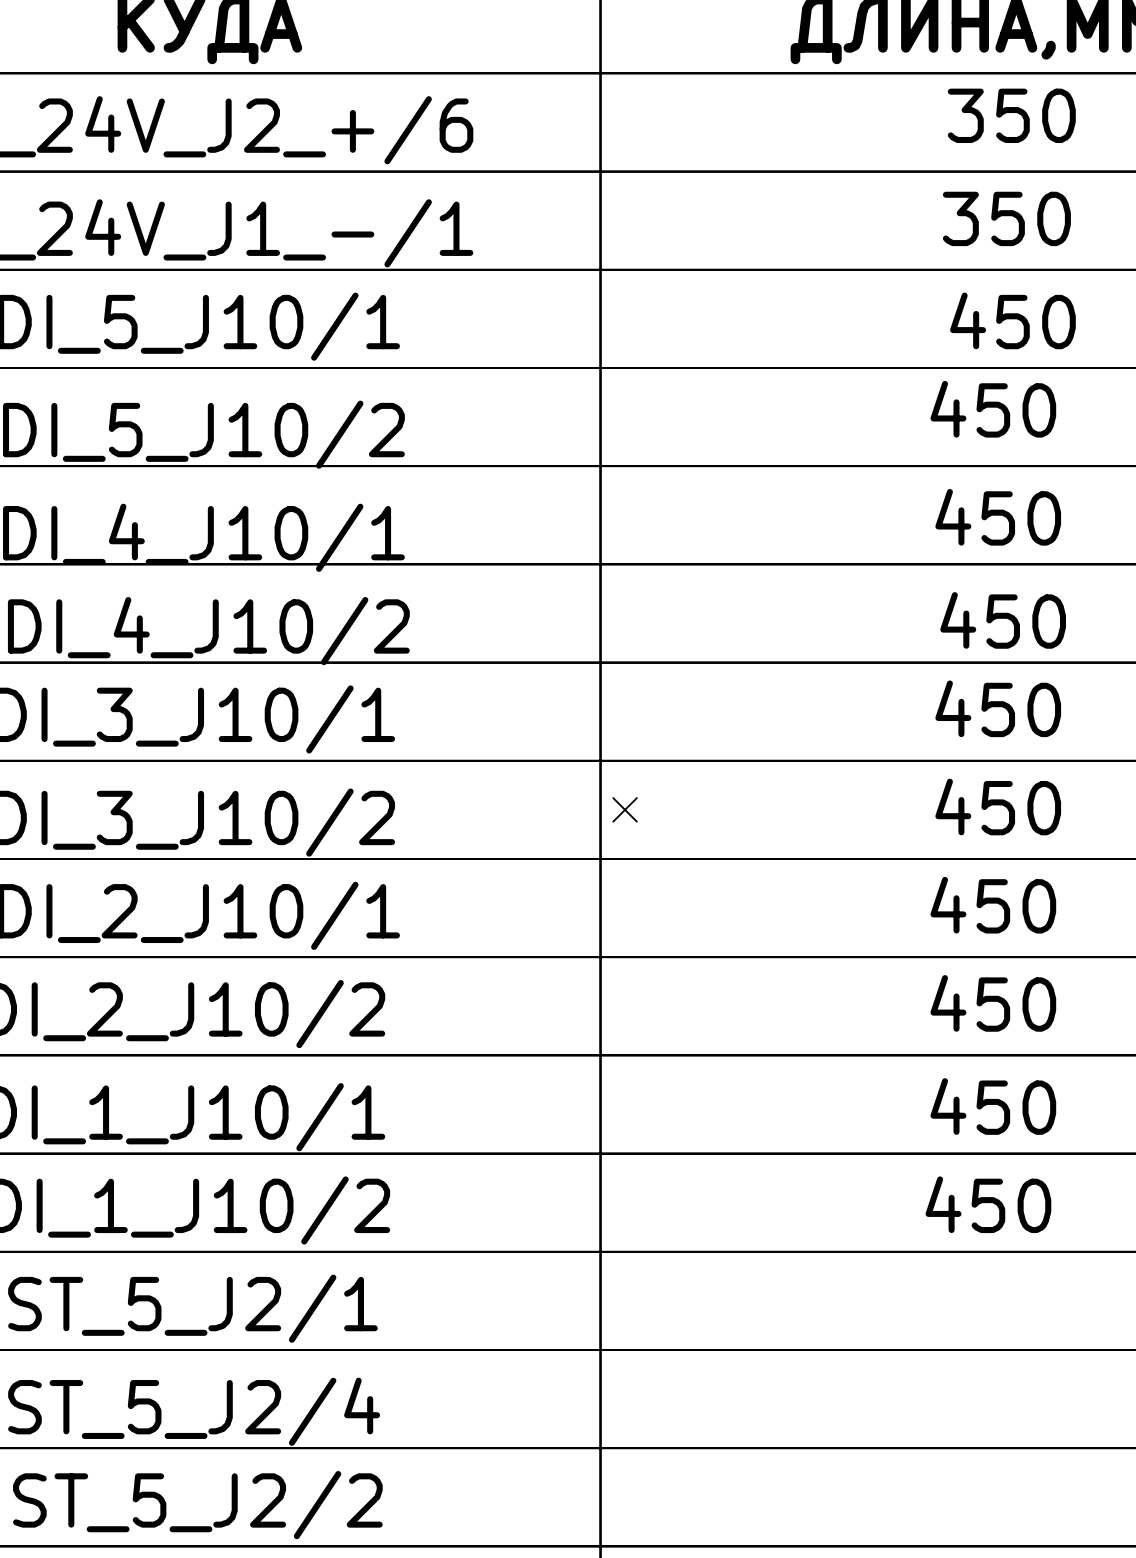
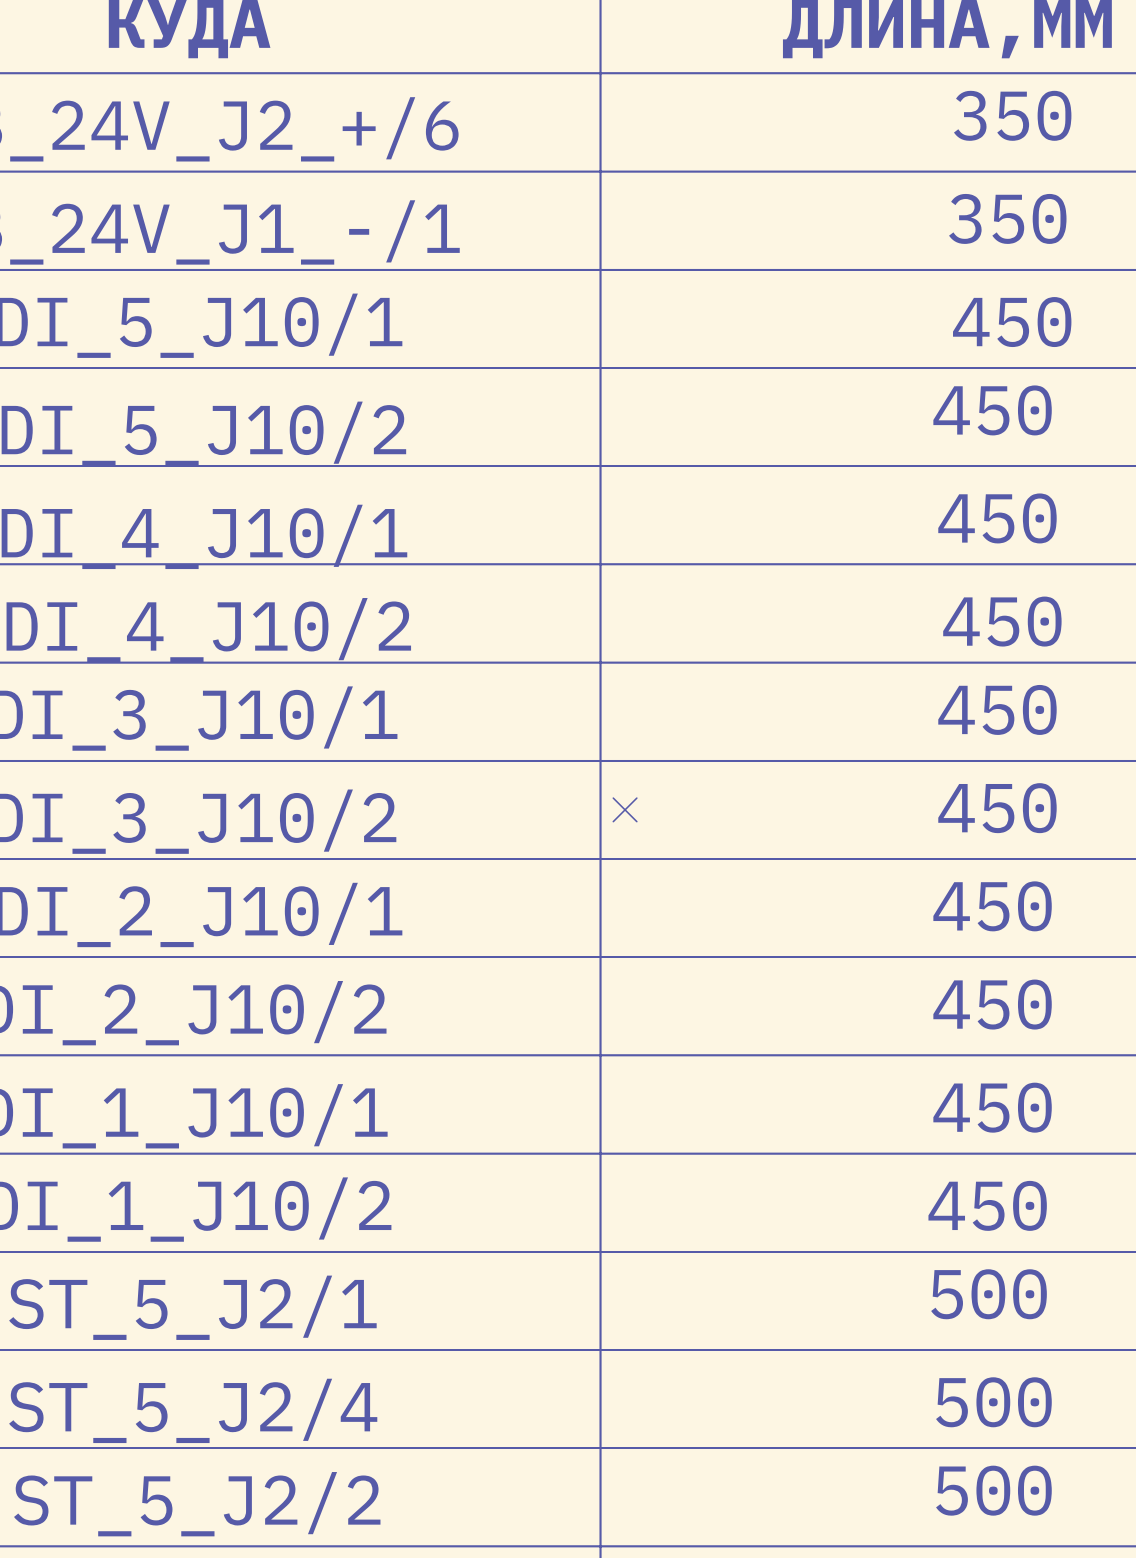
text: none -> 500 (989, 1294)
text: none -> 500 (993, 1402)
text: none -> 500 (993, 1490)

